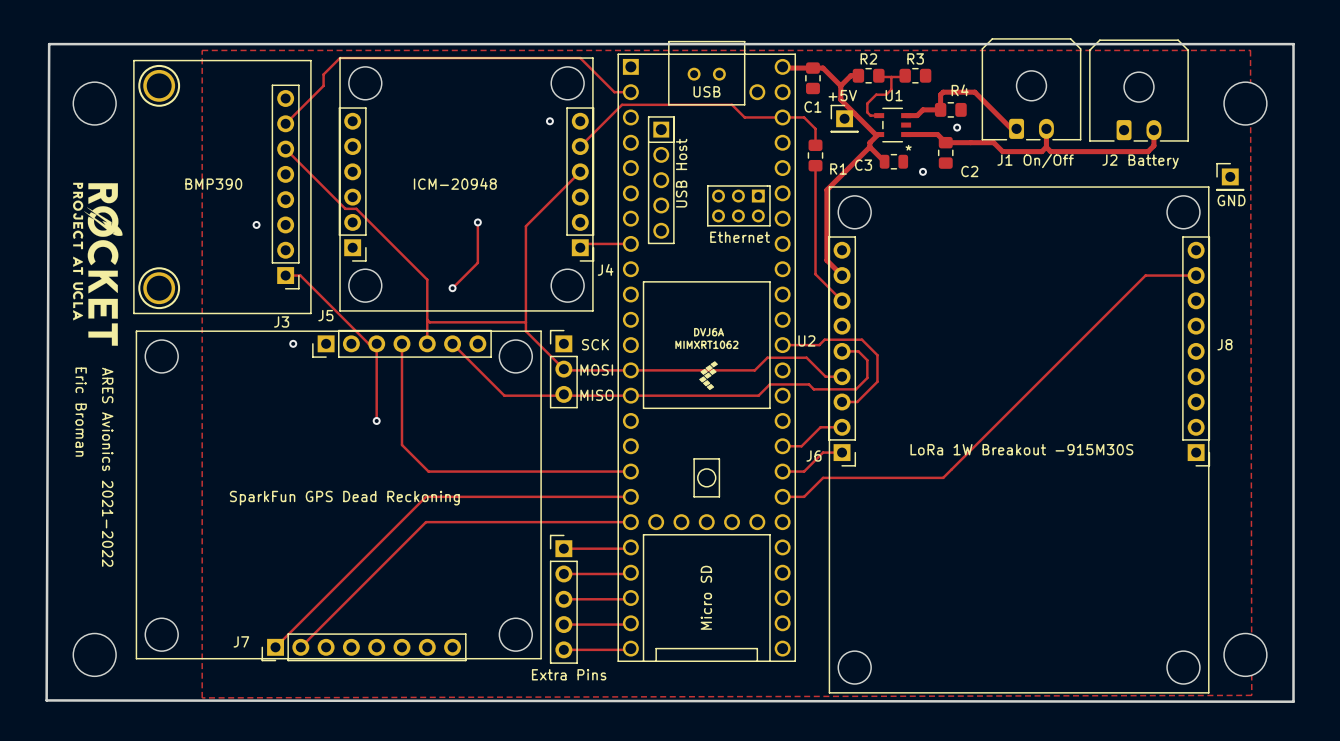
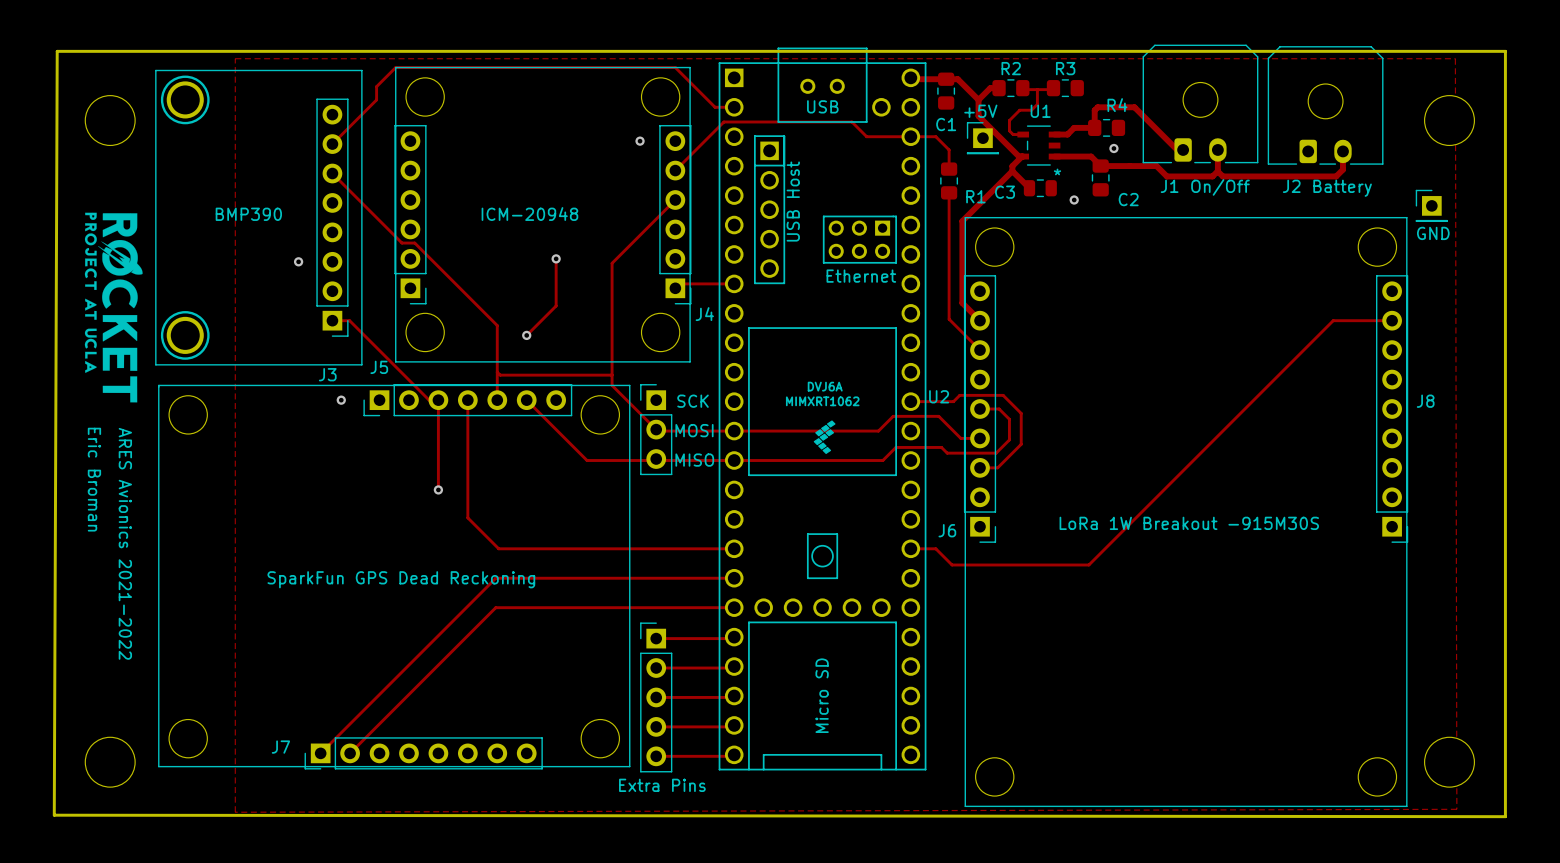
track: (842, 427) (820, 427) (801, 446) (782, 446) -> none
track: (842, 452) (823, 452) (804, 471) -> none
track: (943, 477) (823, 477) (804, 496) (782, 496) -> (1097, 556) (1088, 565) (952, 565) (935, 548)

